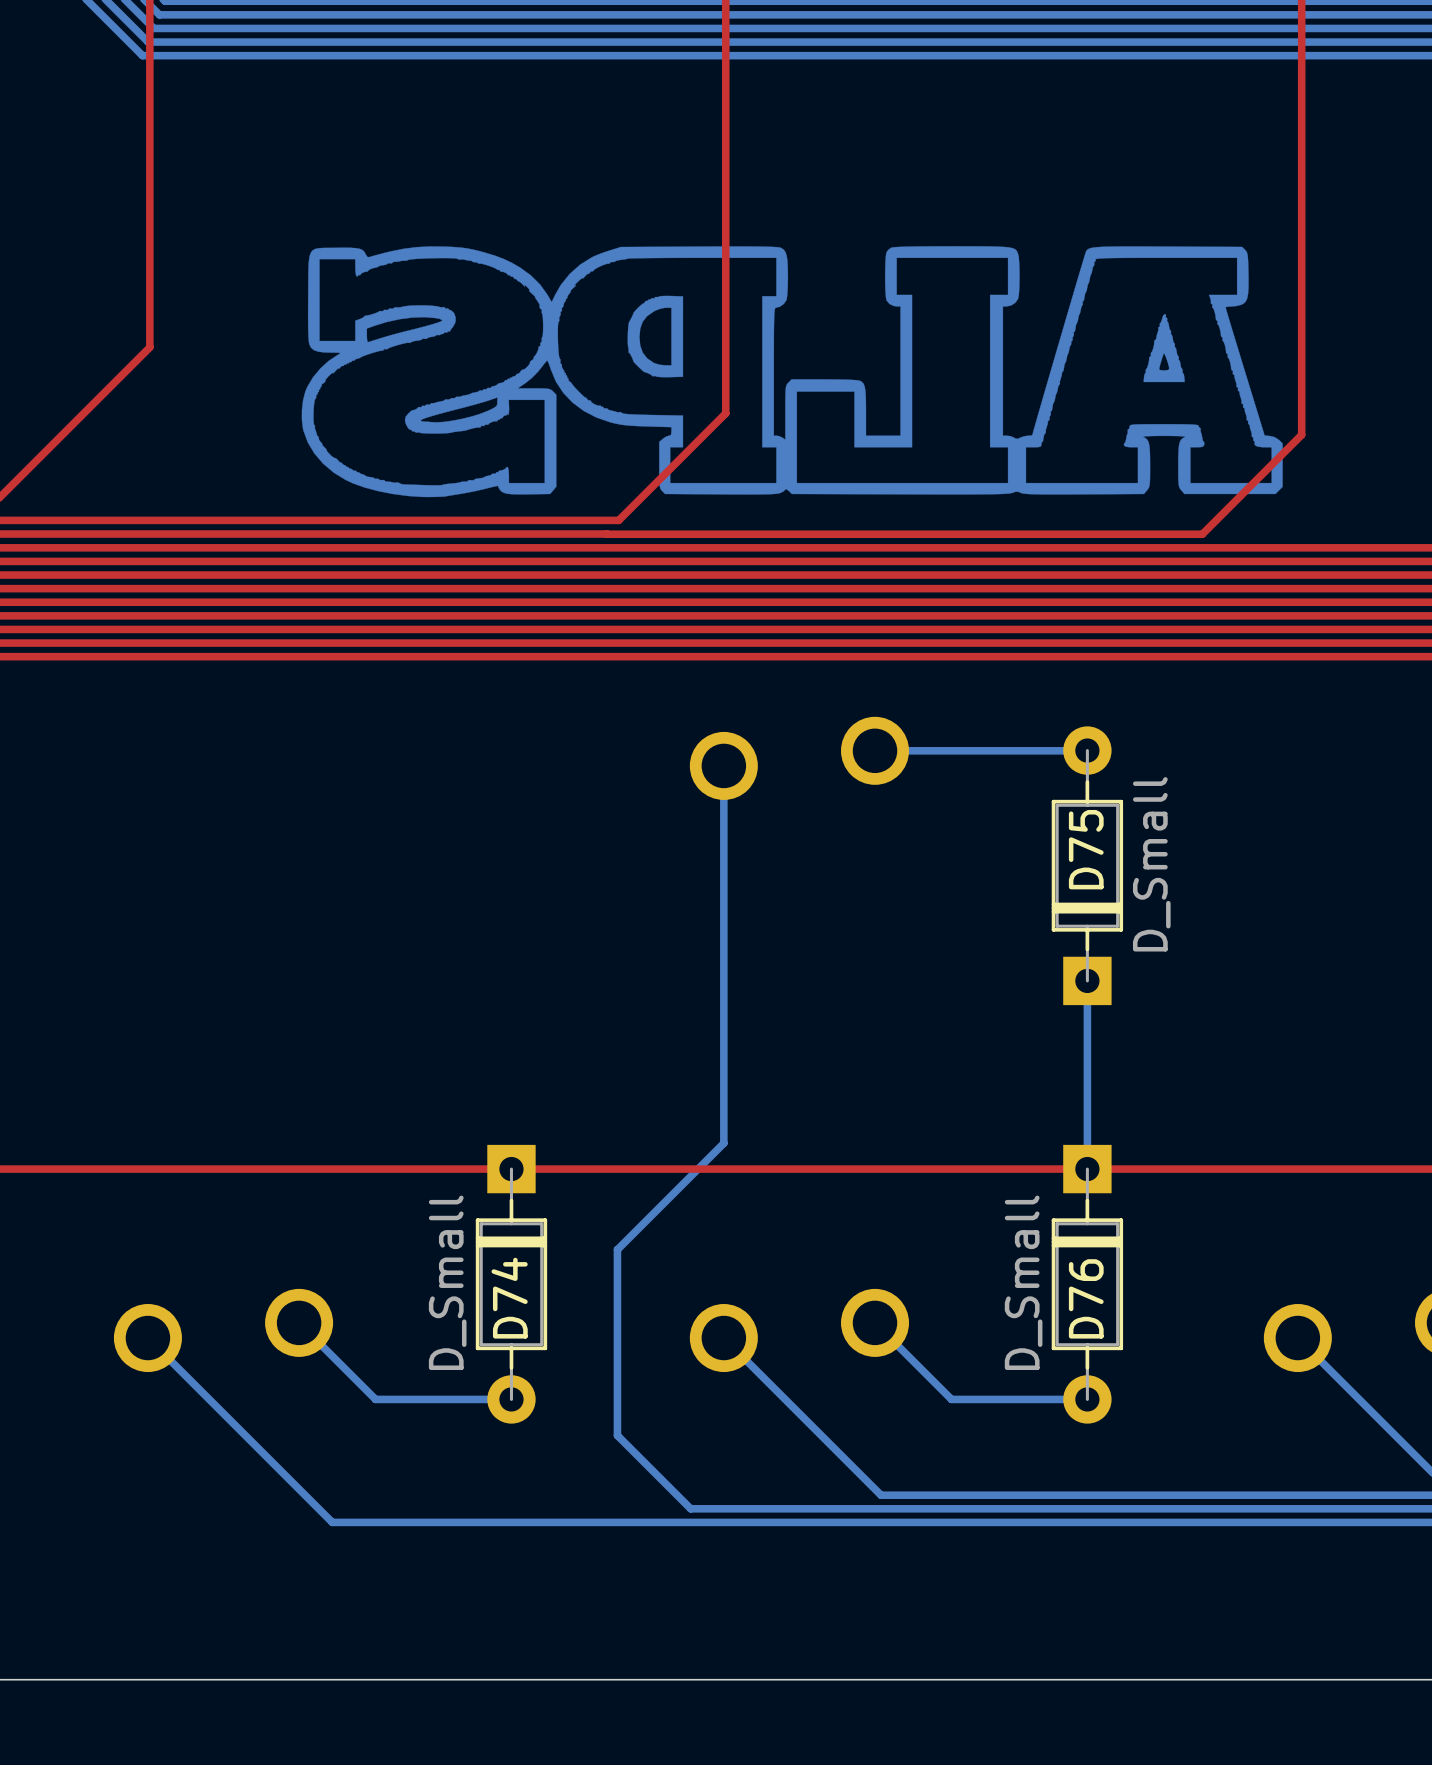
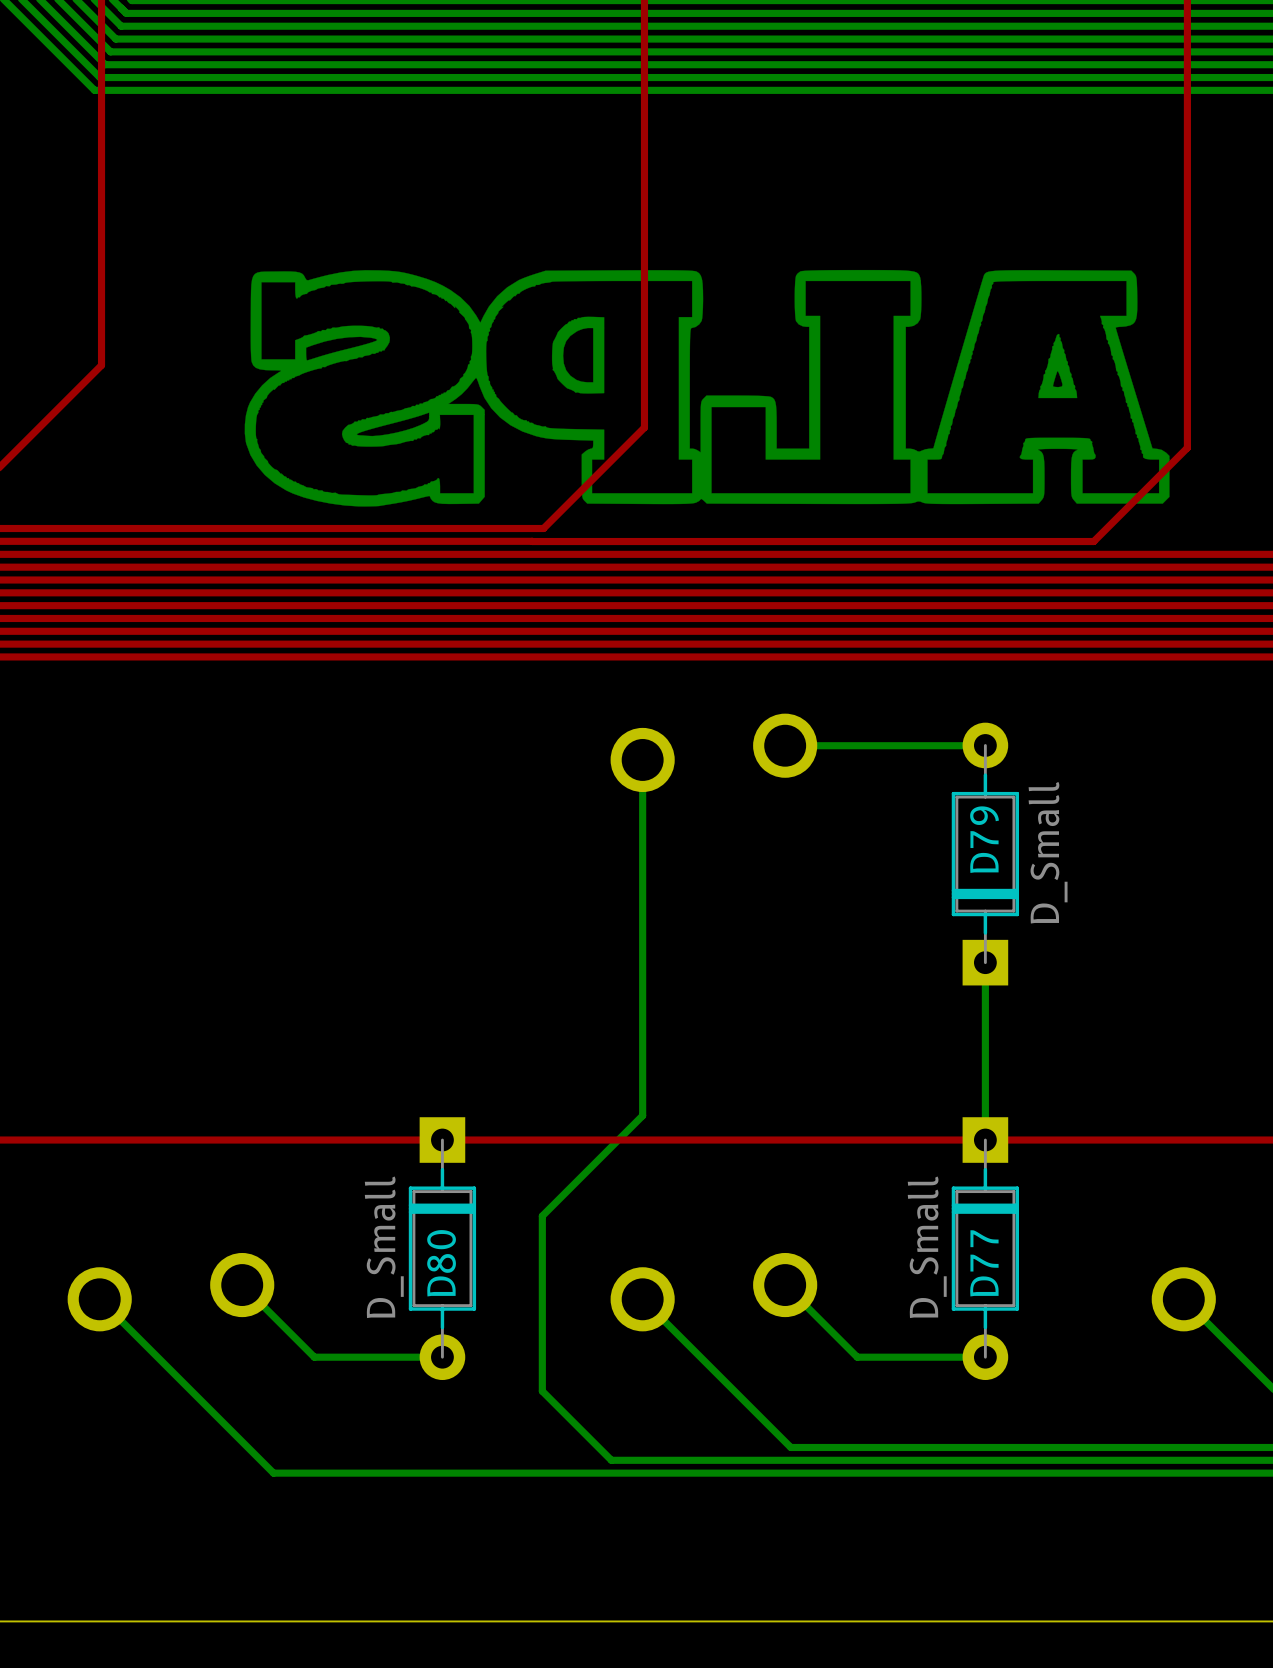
D75 name: D75 (1086, 849) -> D79 (984, 839)
D74 name: D74 (509, 1298) -> D80 (441, 1263)
D76 name: D76 (1086, 1298) -> D77 (984, 1263)

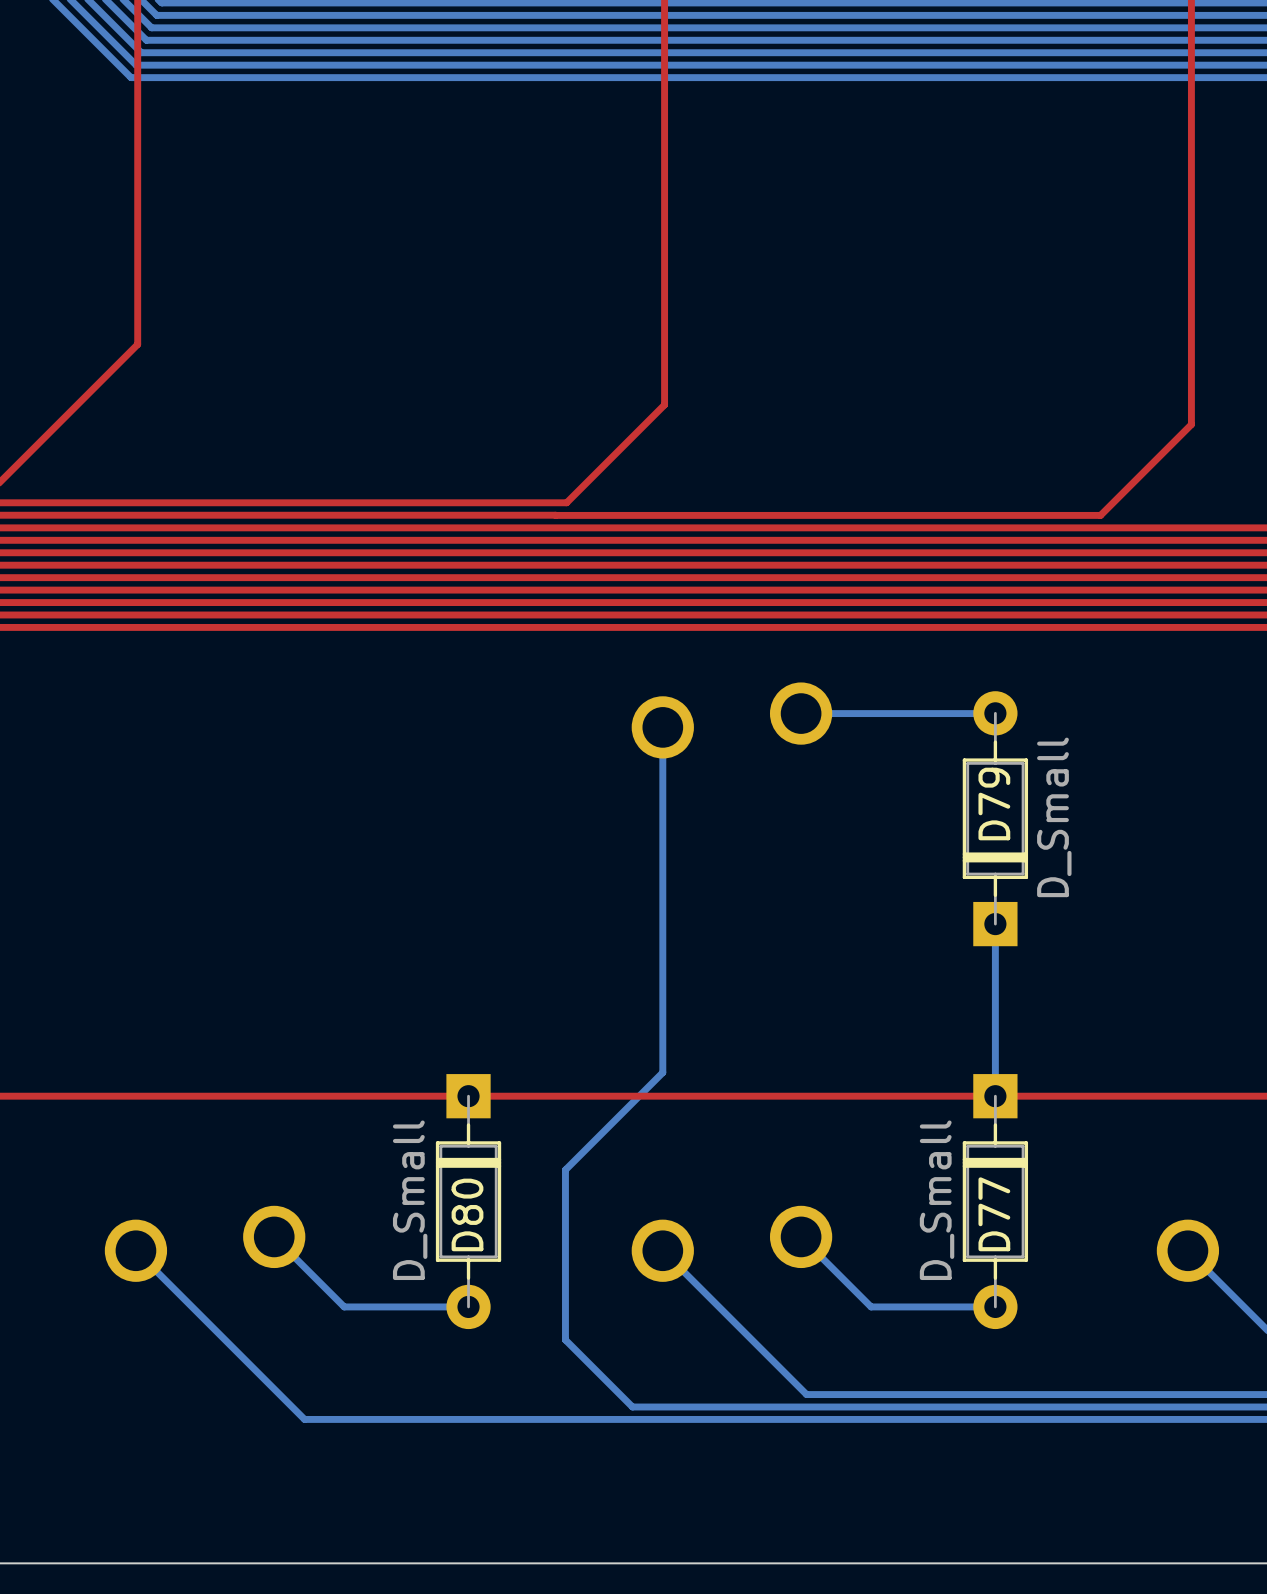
drawing: [244, 269, 1170, 507] -> none

